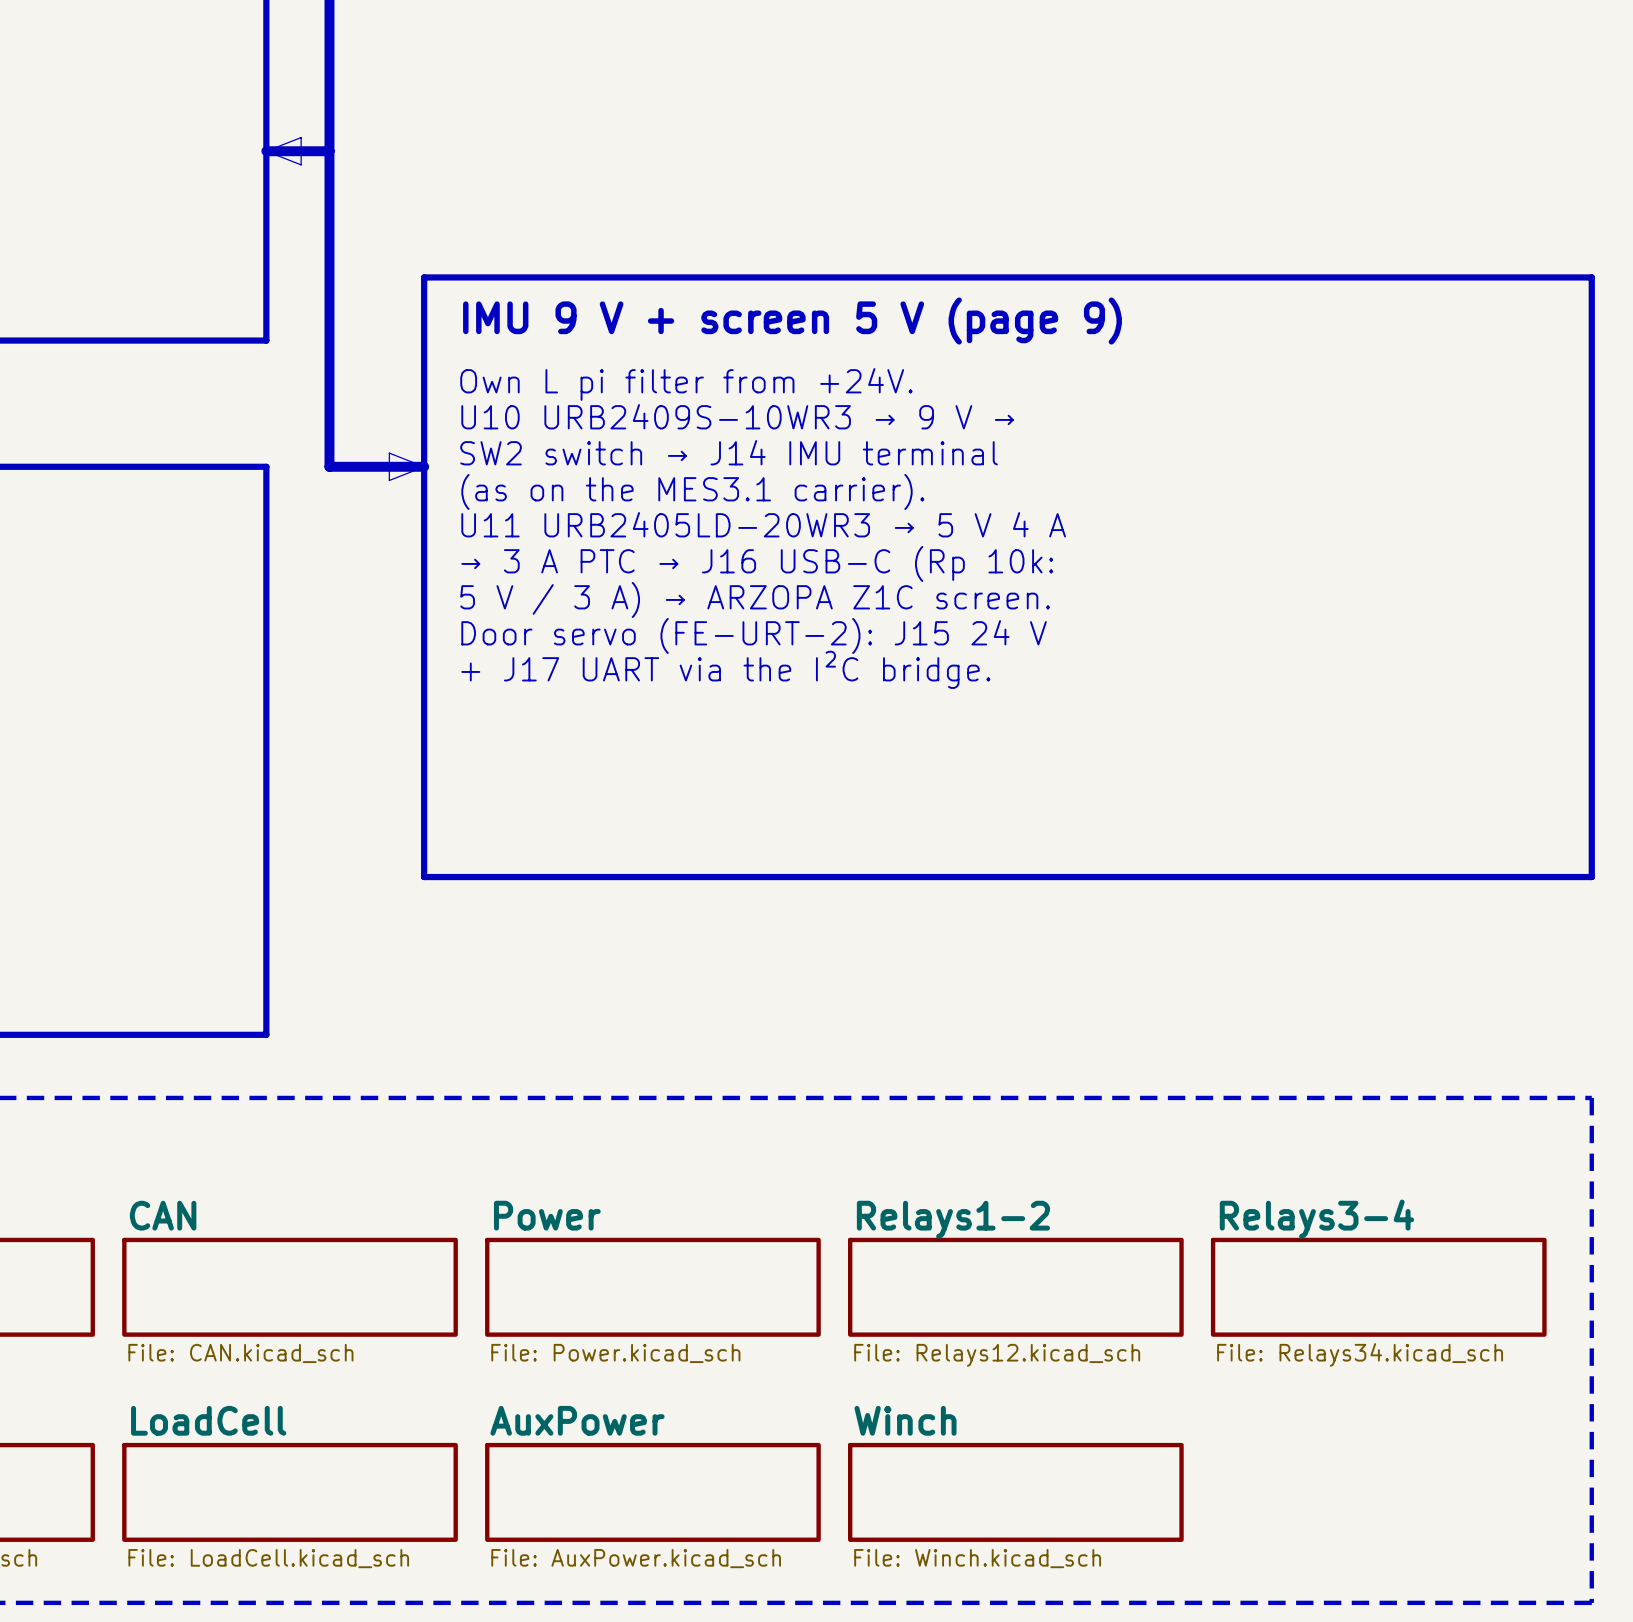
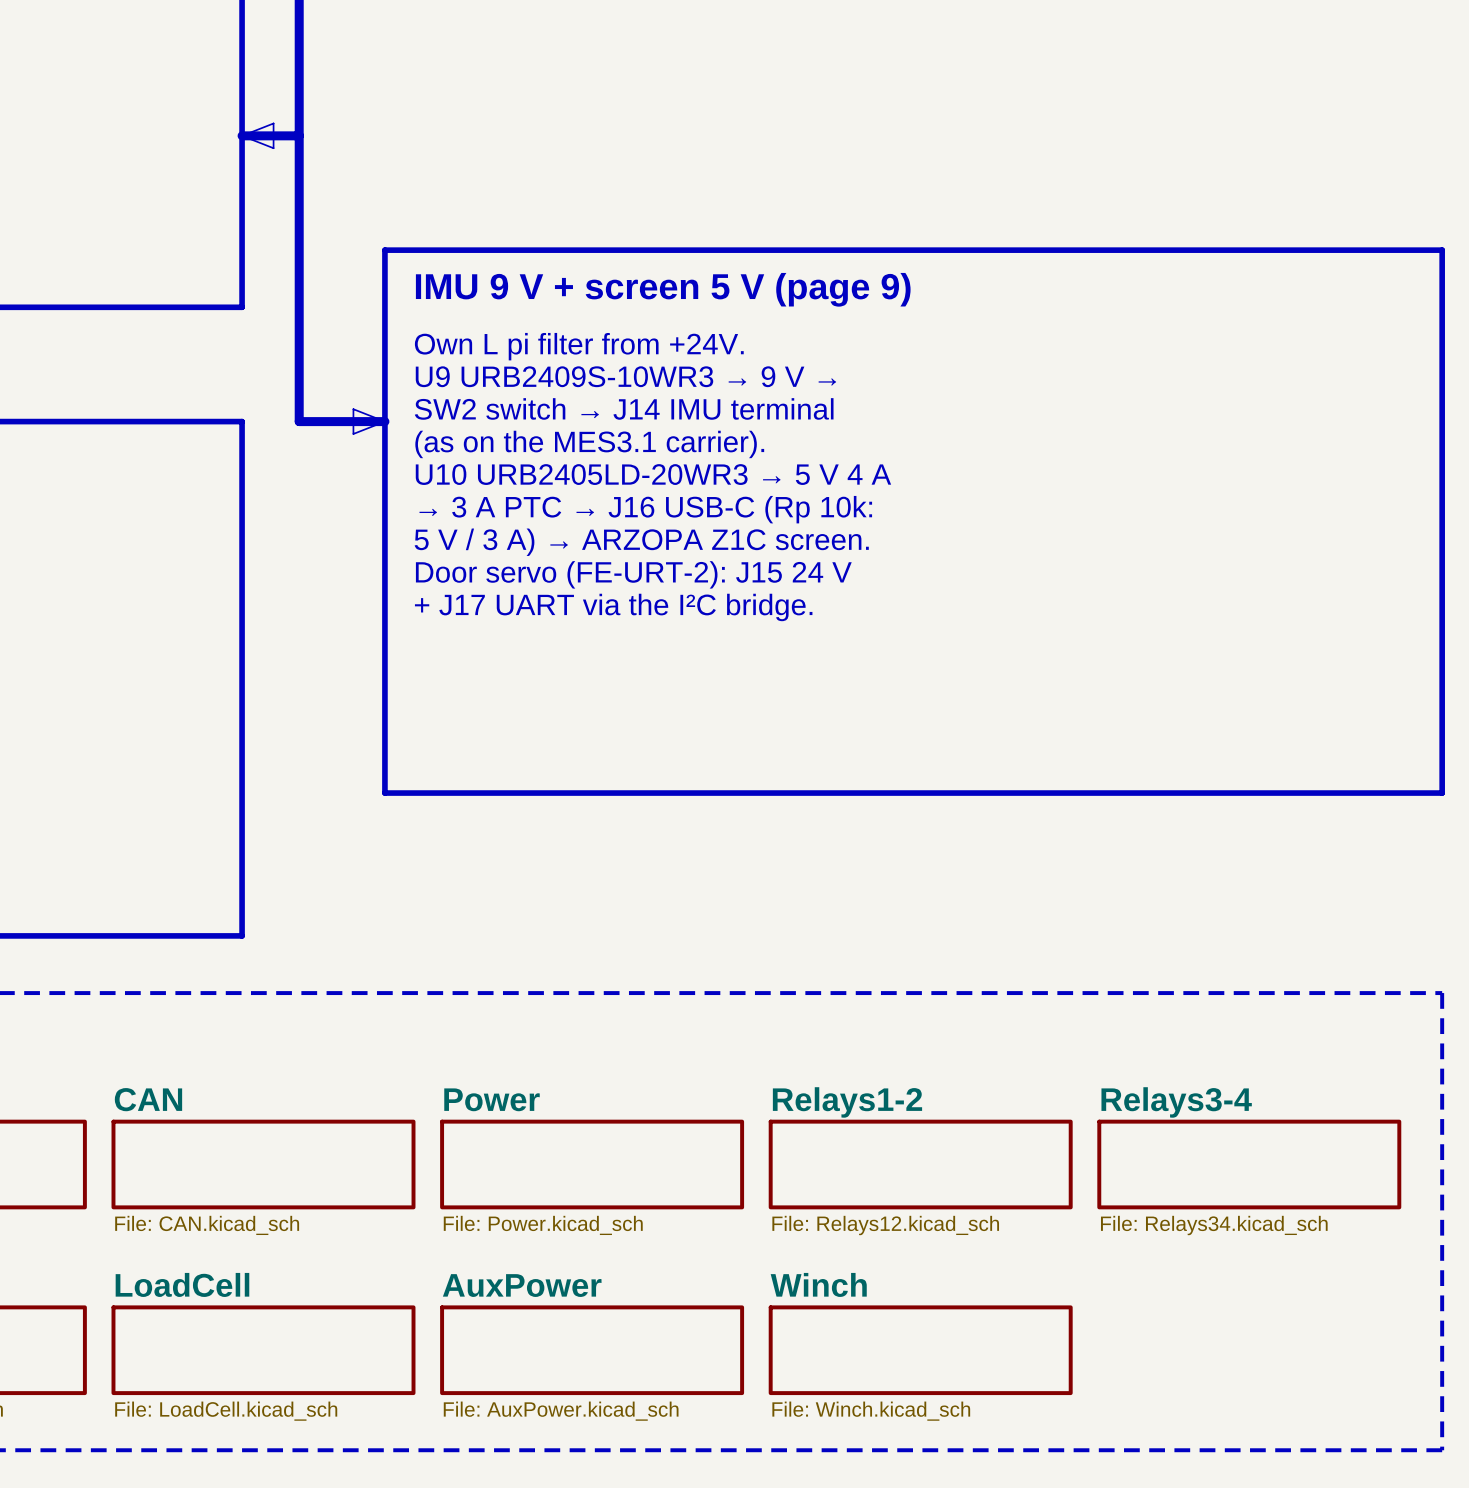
text: U10 URB2409S-10WR3 → 9 V → (737, 416) -> U9 URB2409S-10WR3 → 9 V → (625, 376)
text: U11 URB2405LD-20WR3 → 5 V 4 A (763, 524) -> U10 URB2405LD-20WR3 → 5 V 4 A (653, 474)

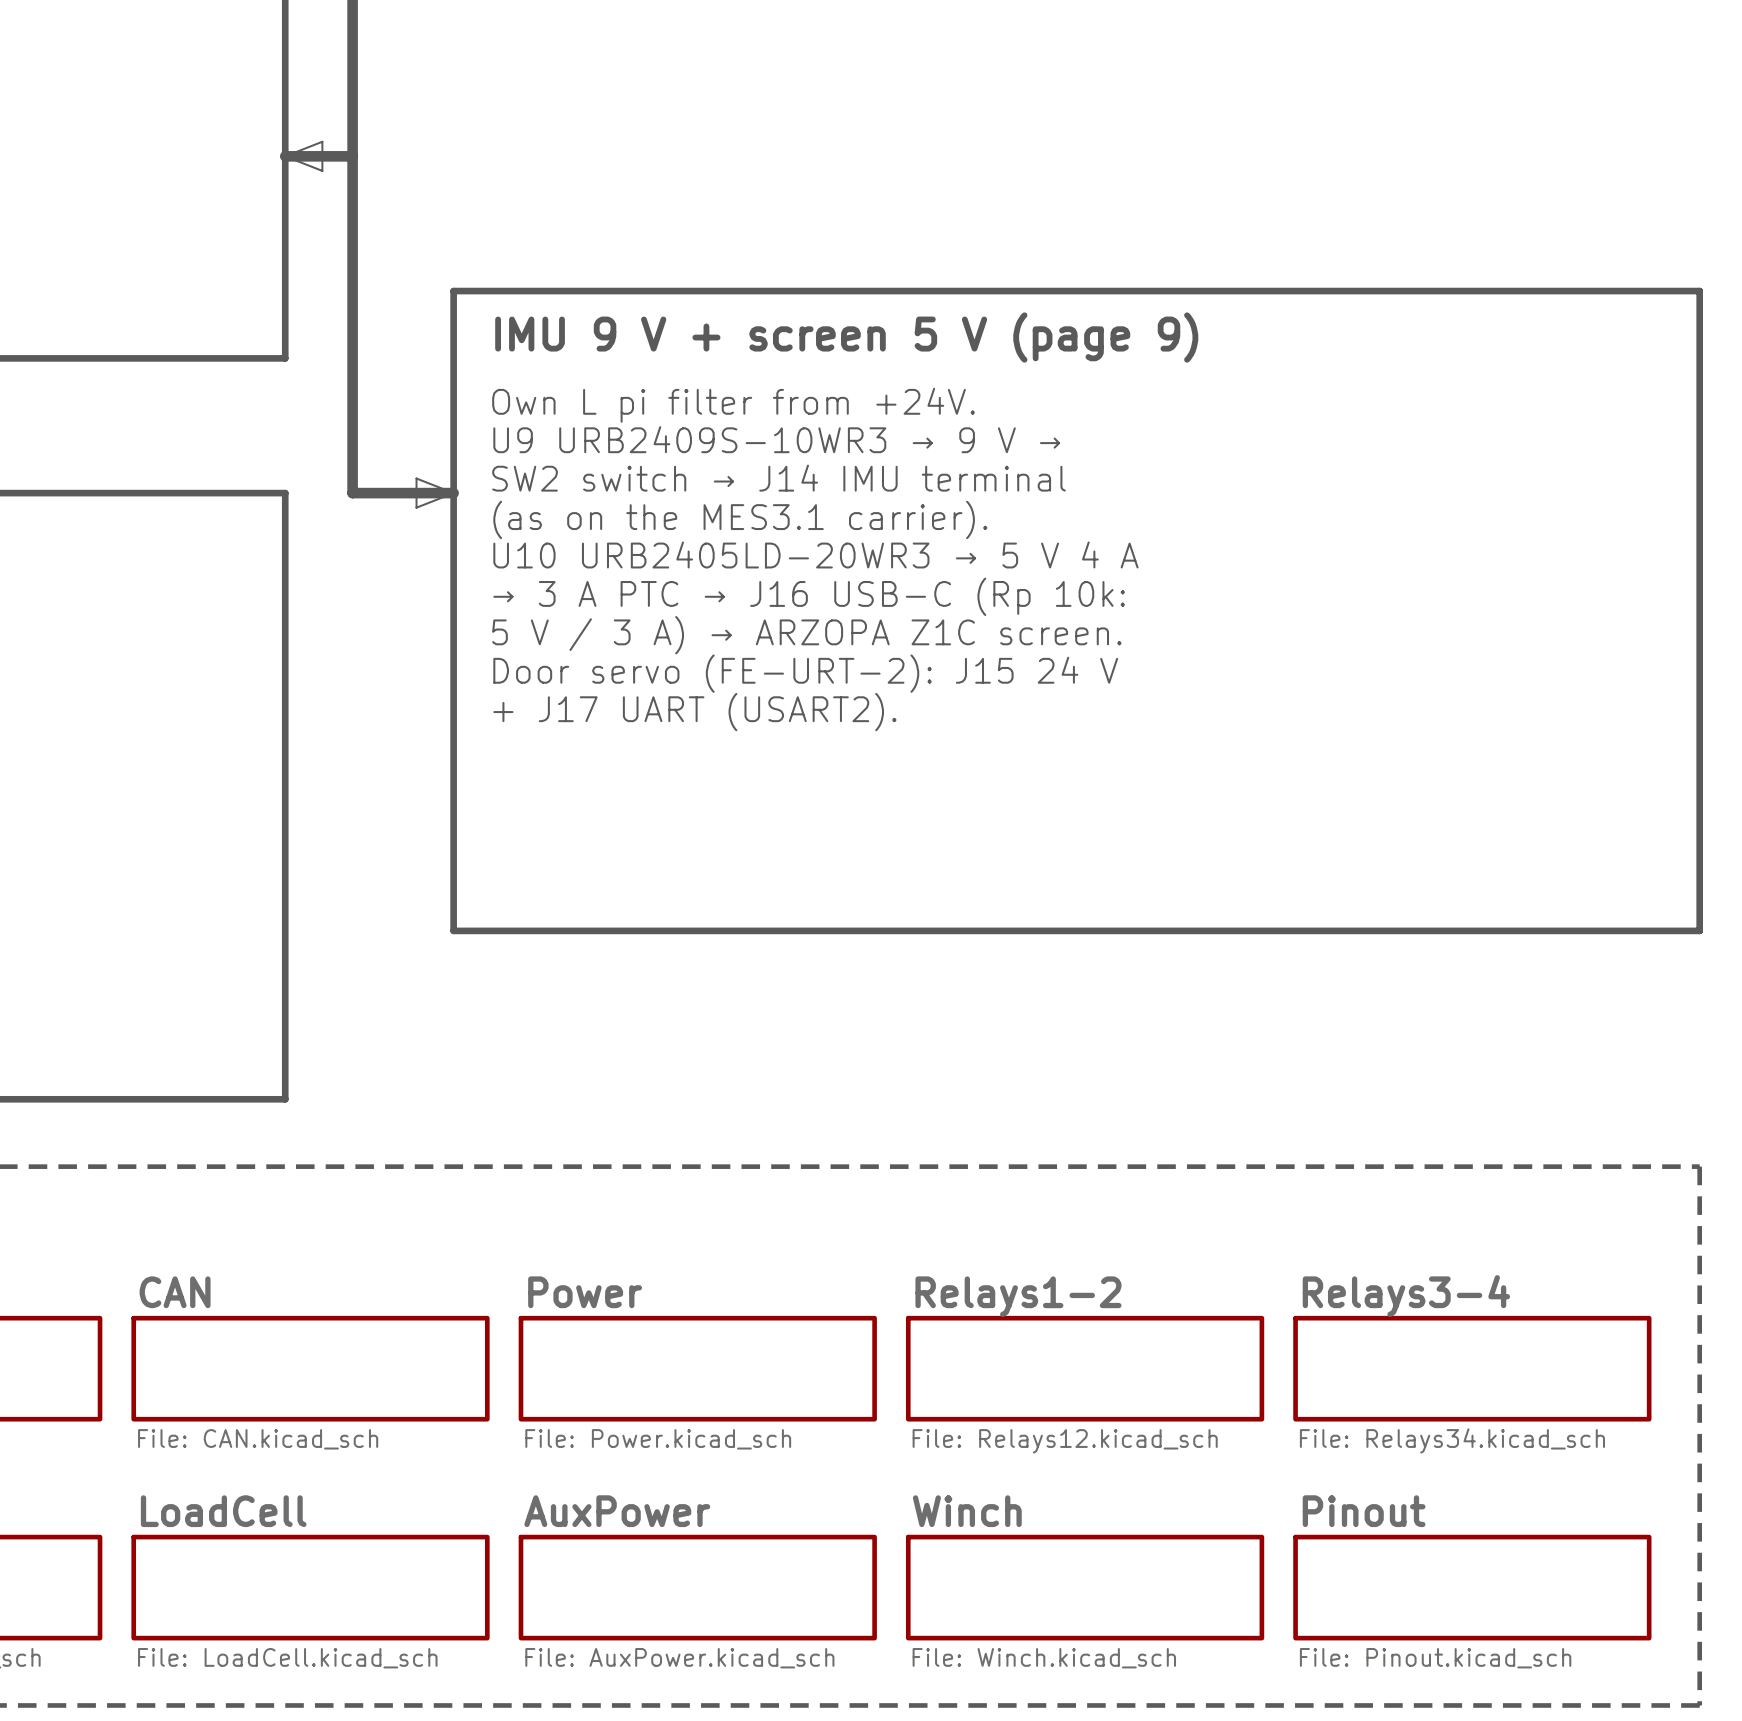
text: + J17 UART via the I²C bridge. (613, 607) -> + J17 UART (USART2). (694, 712)
sheet Pinout: none -> File: Pinout.kicad_sch (1472, 1587)

